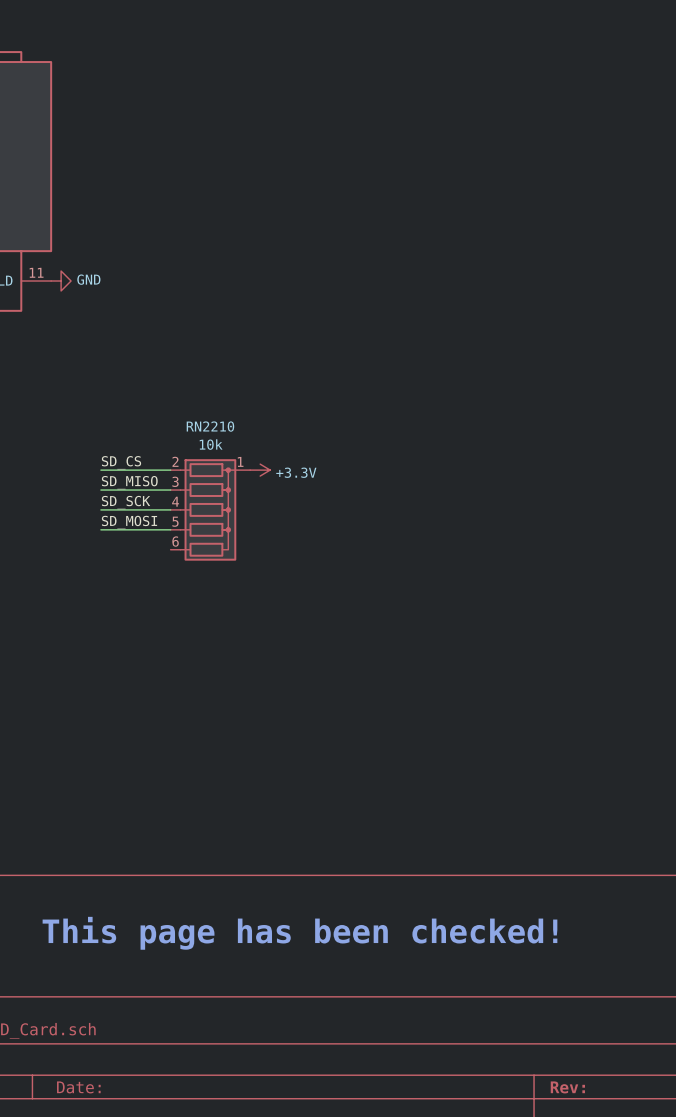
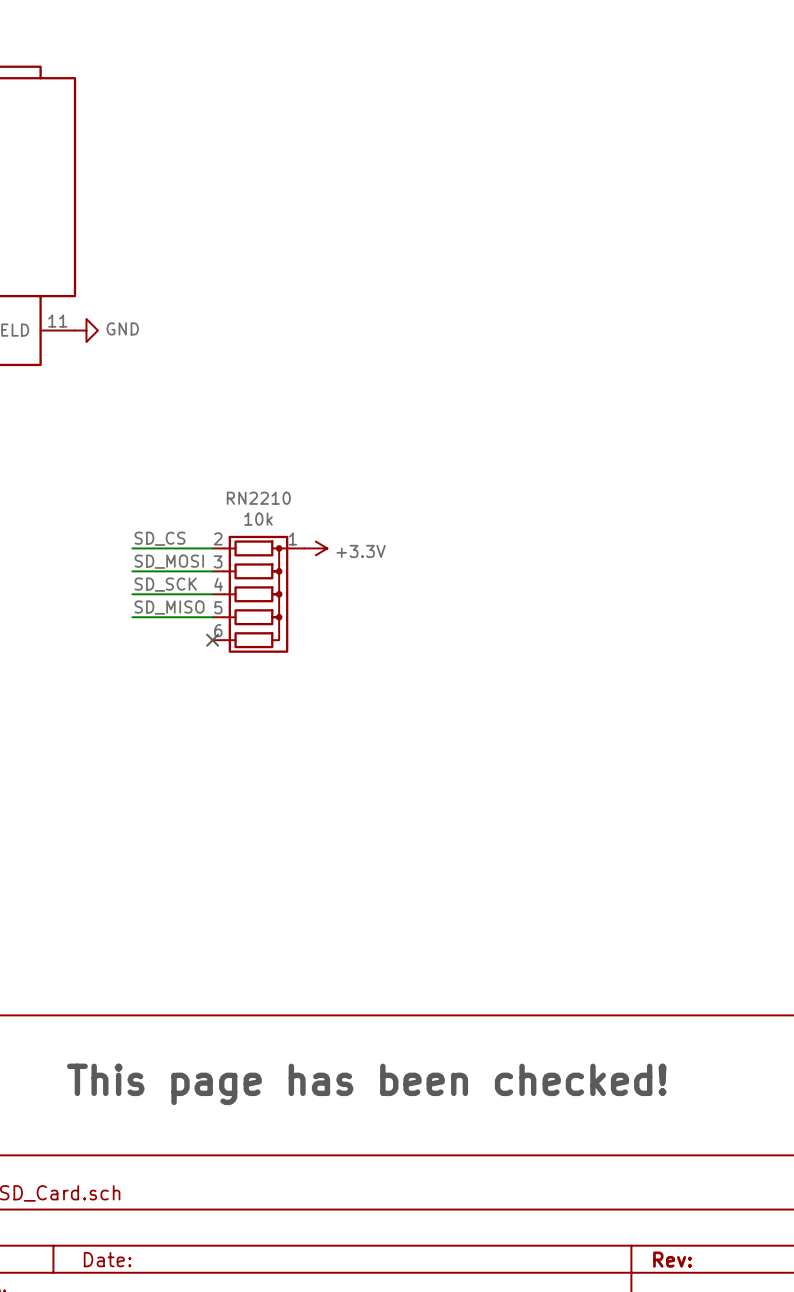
label: SD_MISO (129, 482) -> SD_MOSI (169, 561)
label: SD_MOSI (129, 522) -> SD_MISO (169, 607)
no-connect mark: none -> (212, 640)

